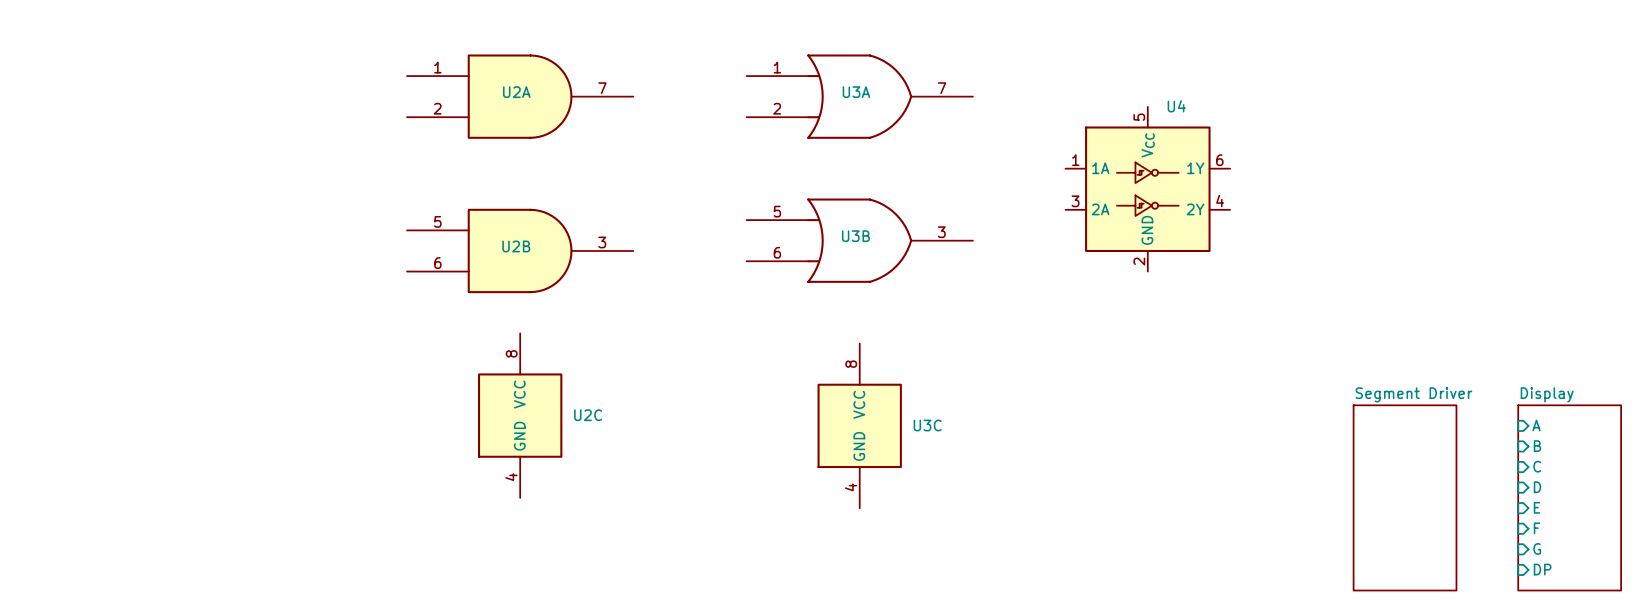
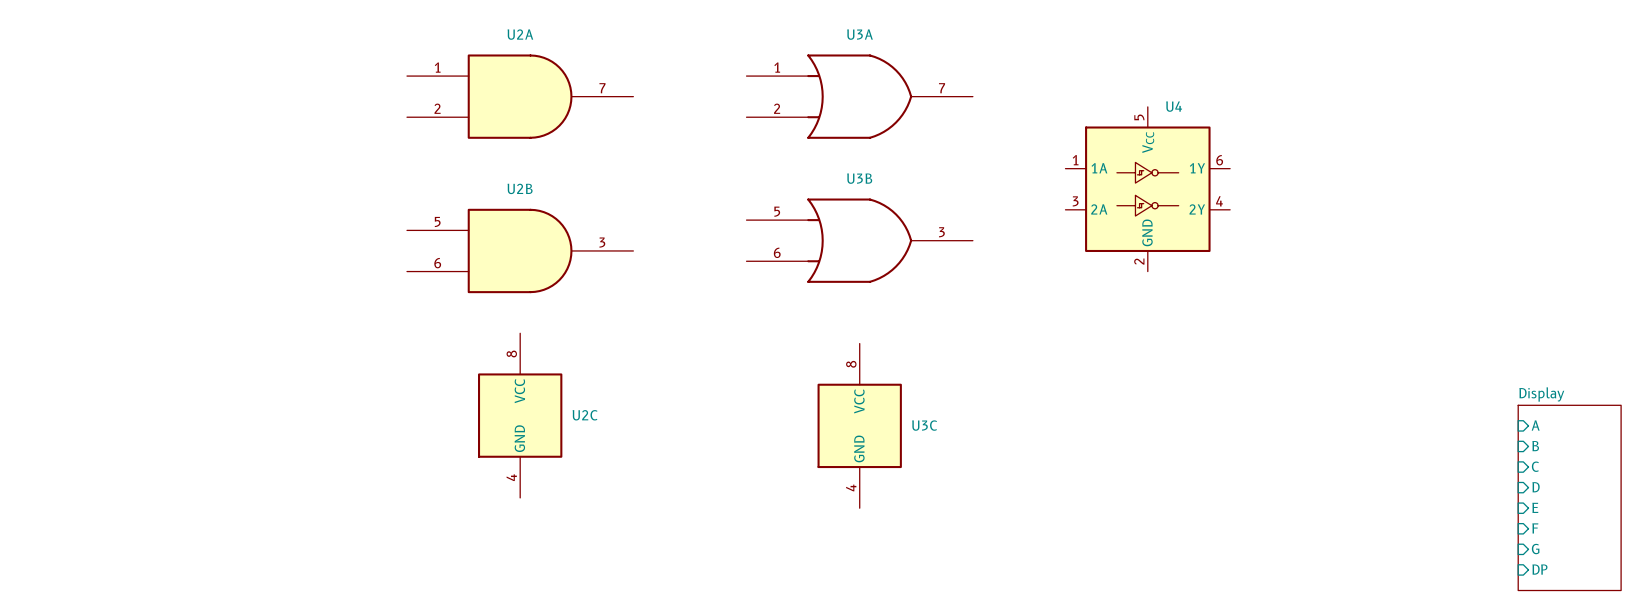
U2A name position: U2A (516, 92) -> U2A (520, 34)
U3A name position: U3A (856, 92) -> U3A (860, 34)
U3B name position: U3B (855, 236) -> U3B (859, 178)
U2B name position: U2B (516, 246) -> U2B (520, 188)
sheet Segment Driver: (1405, 497) -> none

